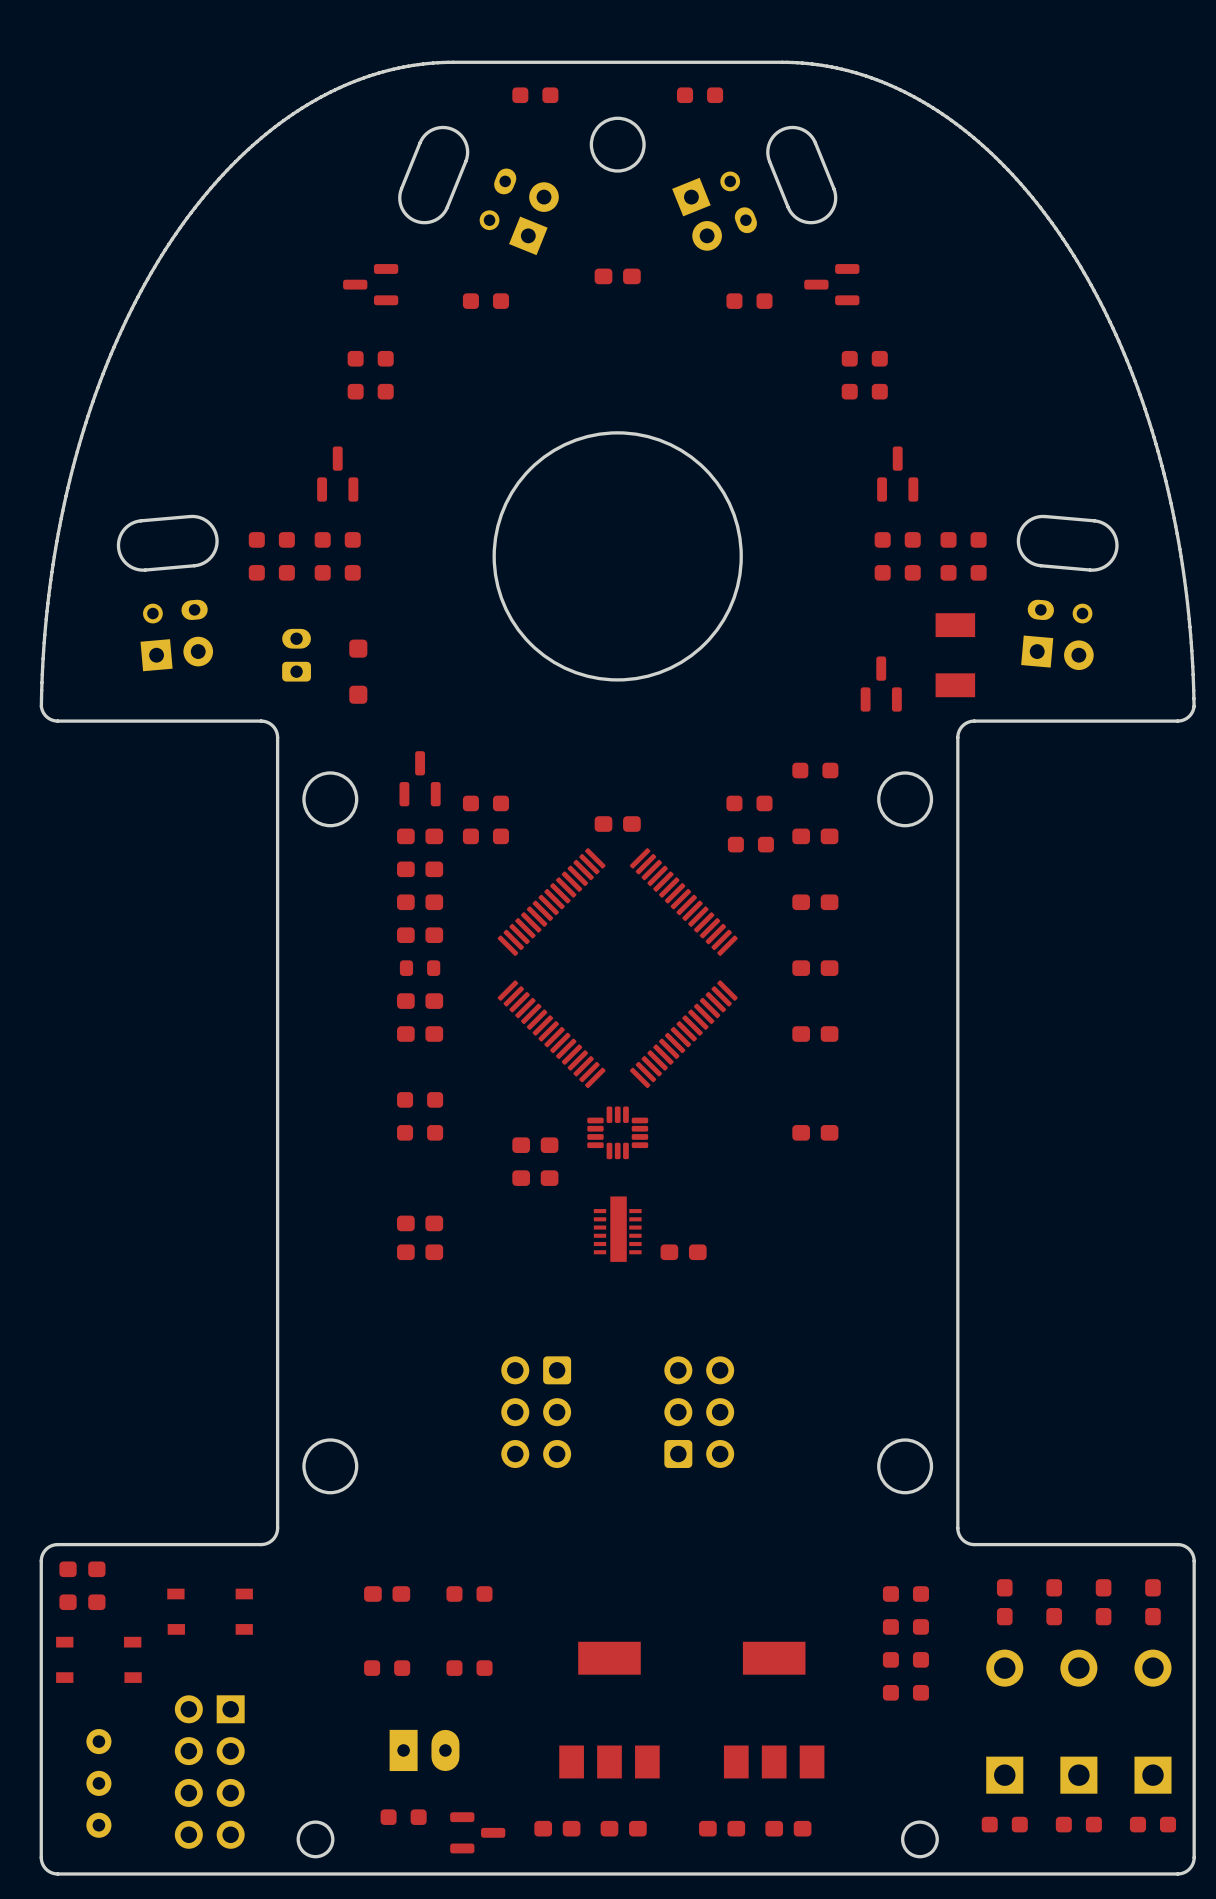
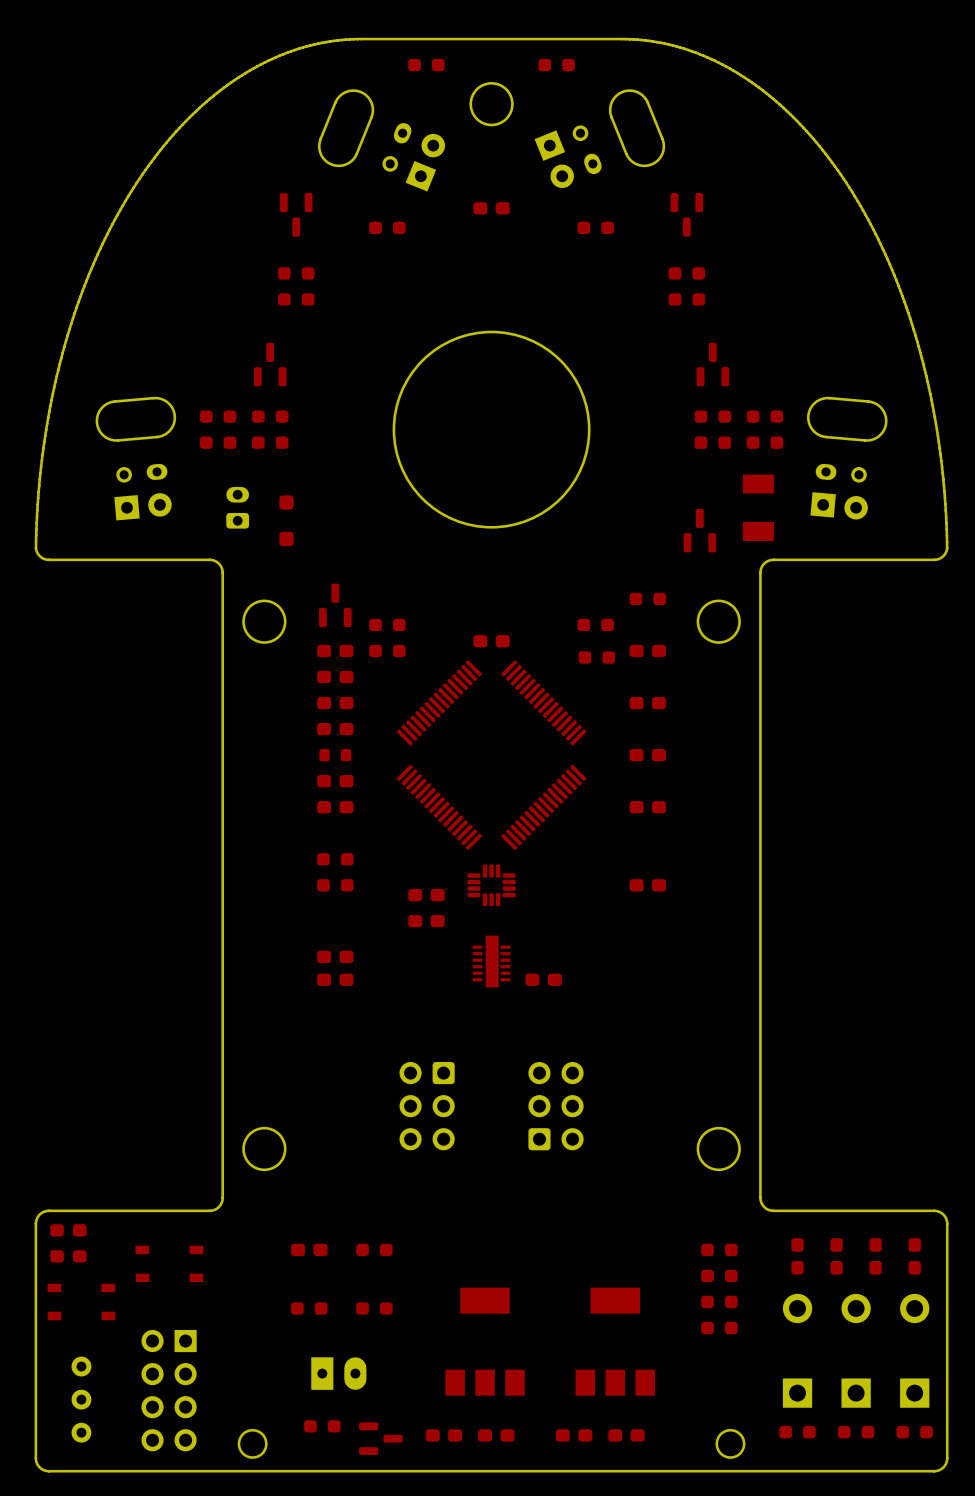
part rotation: 0° (370, 284) -> 90° counterclockwise (296, 214)
part rotation: 0° (831, 284) -> 90° counterclockwise (686, 214)

